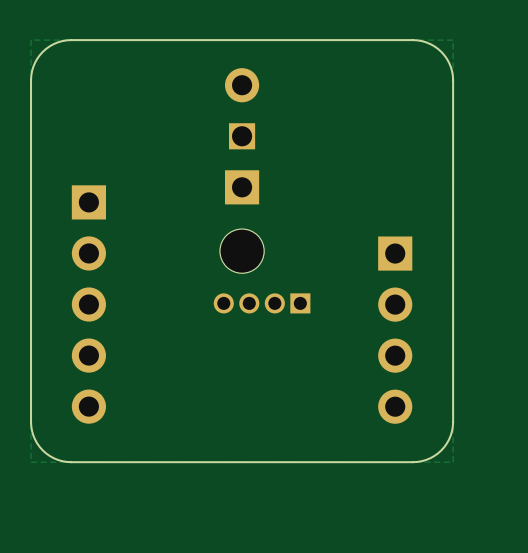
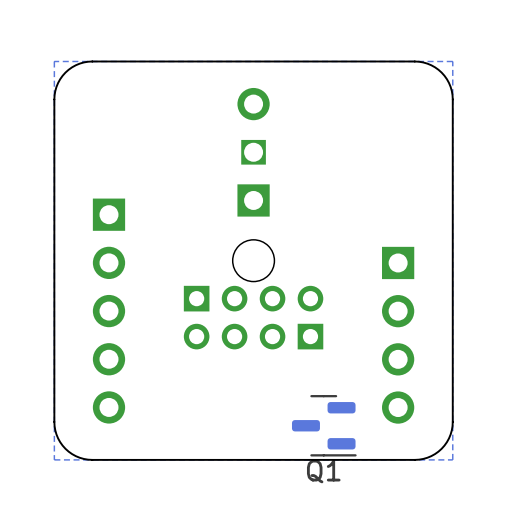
part: none -> (253, 298)
part: (262, 303) -> none
part: none -> (253, 336)
Q1: none -> (324, 425)

